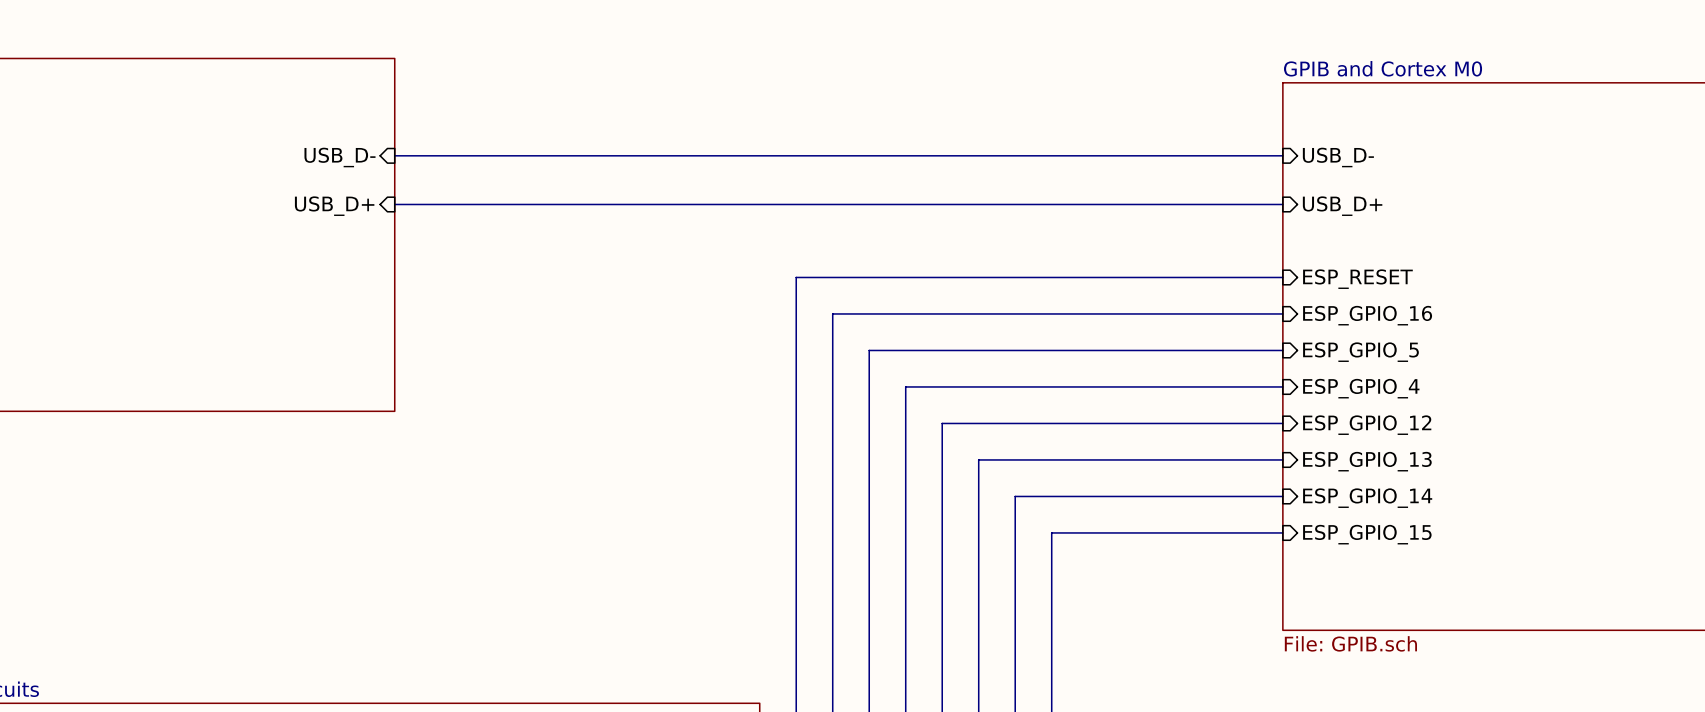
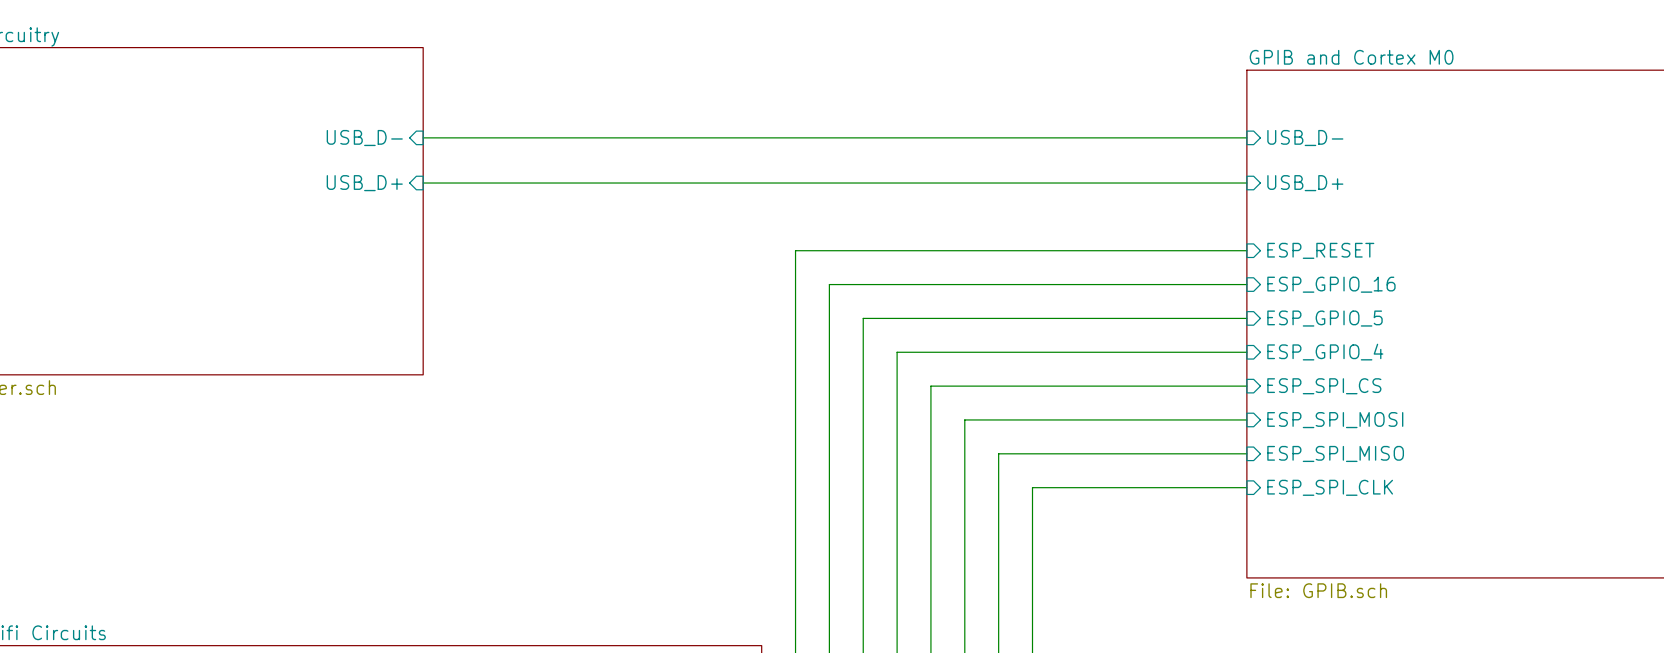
sheet pin: ESP_GPIO_12 (1367, 425) -> ESP_SPI_CS (1324, 386)
sheet pin: ESP_GPIO_13 (1367, 461) -> ESP_SPI_MOSI (1335, 420)
sheet pin: ESP_GPIO_14 (1367, 498) -> ESP_SPI_MISO (1335, 453)
sheet pin: ESP_GPIO_15 (1367, 534) -> ESP_SPI_CLK (1330, 487)

